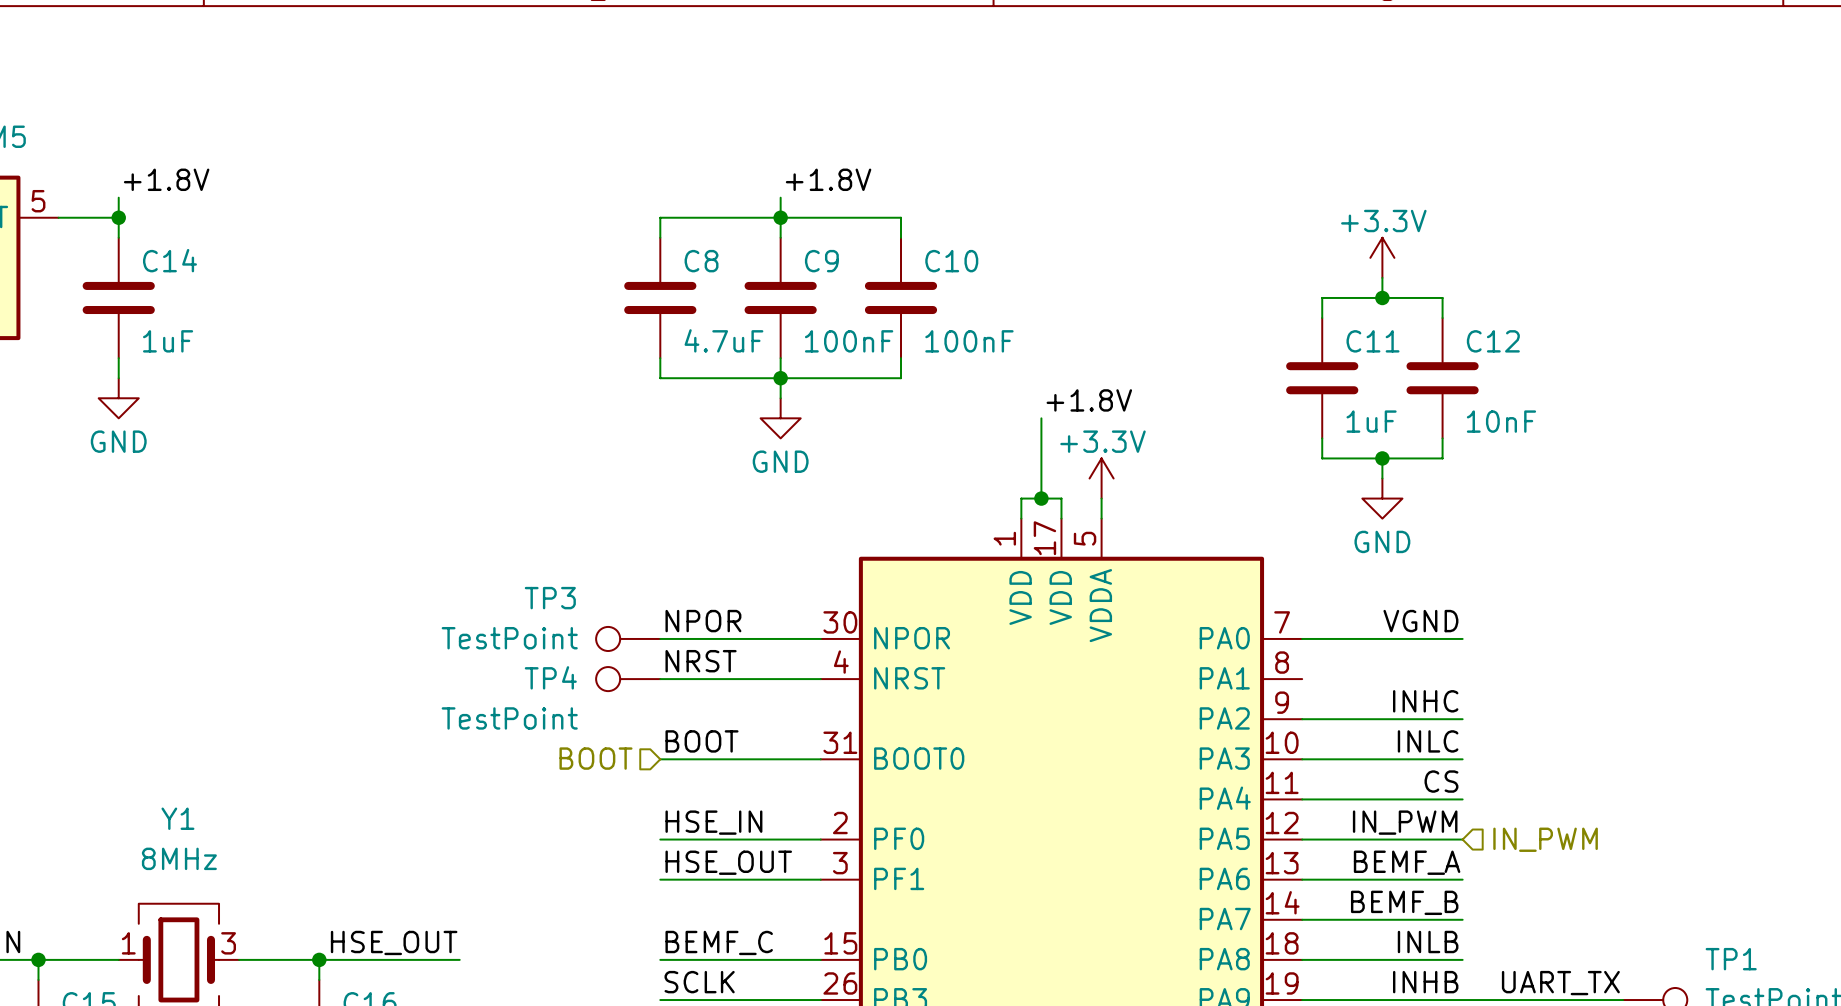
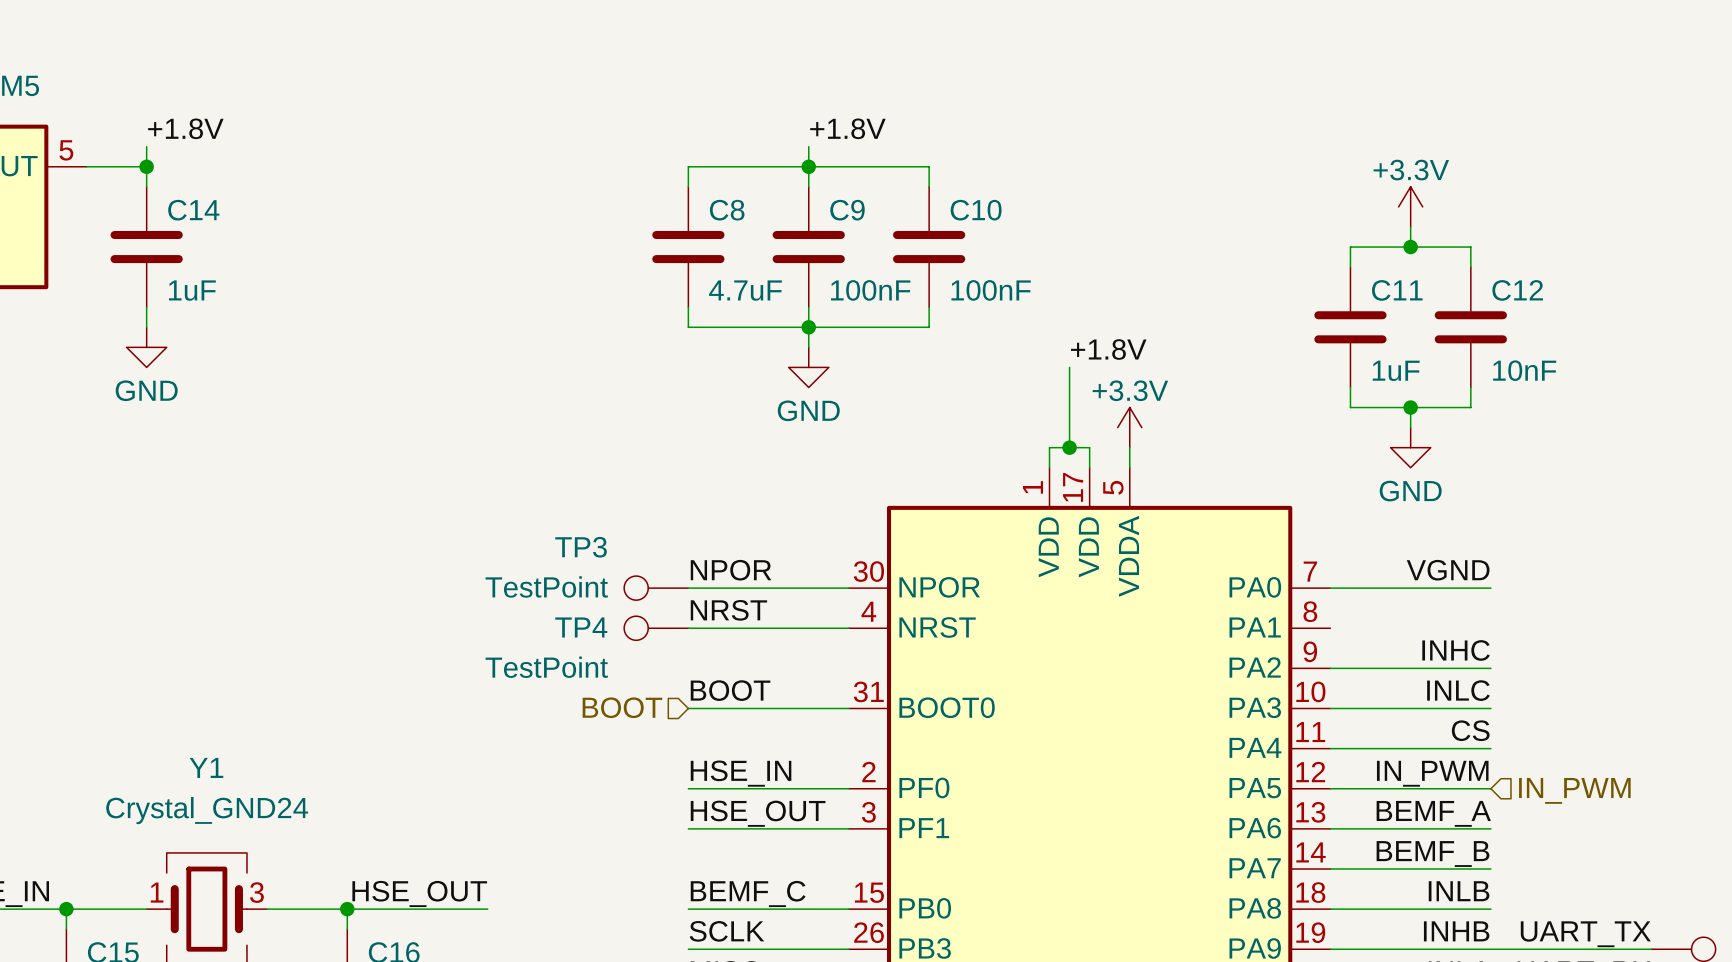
Y1 value: 8MHz (179, 858) -> Crystal_GND24 (207, 810)

